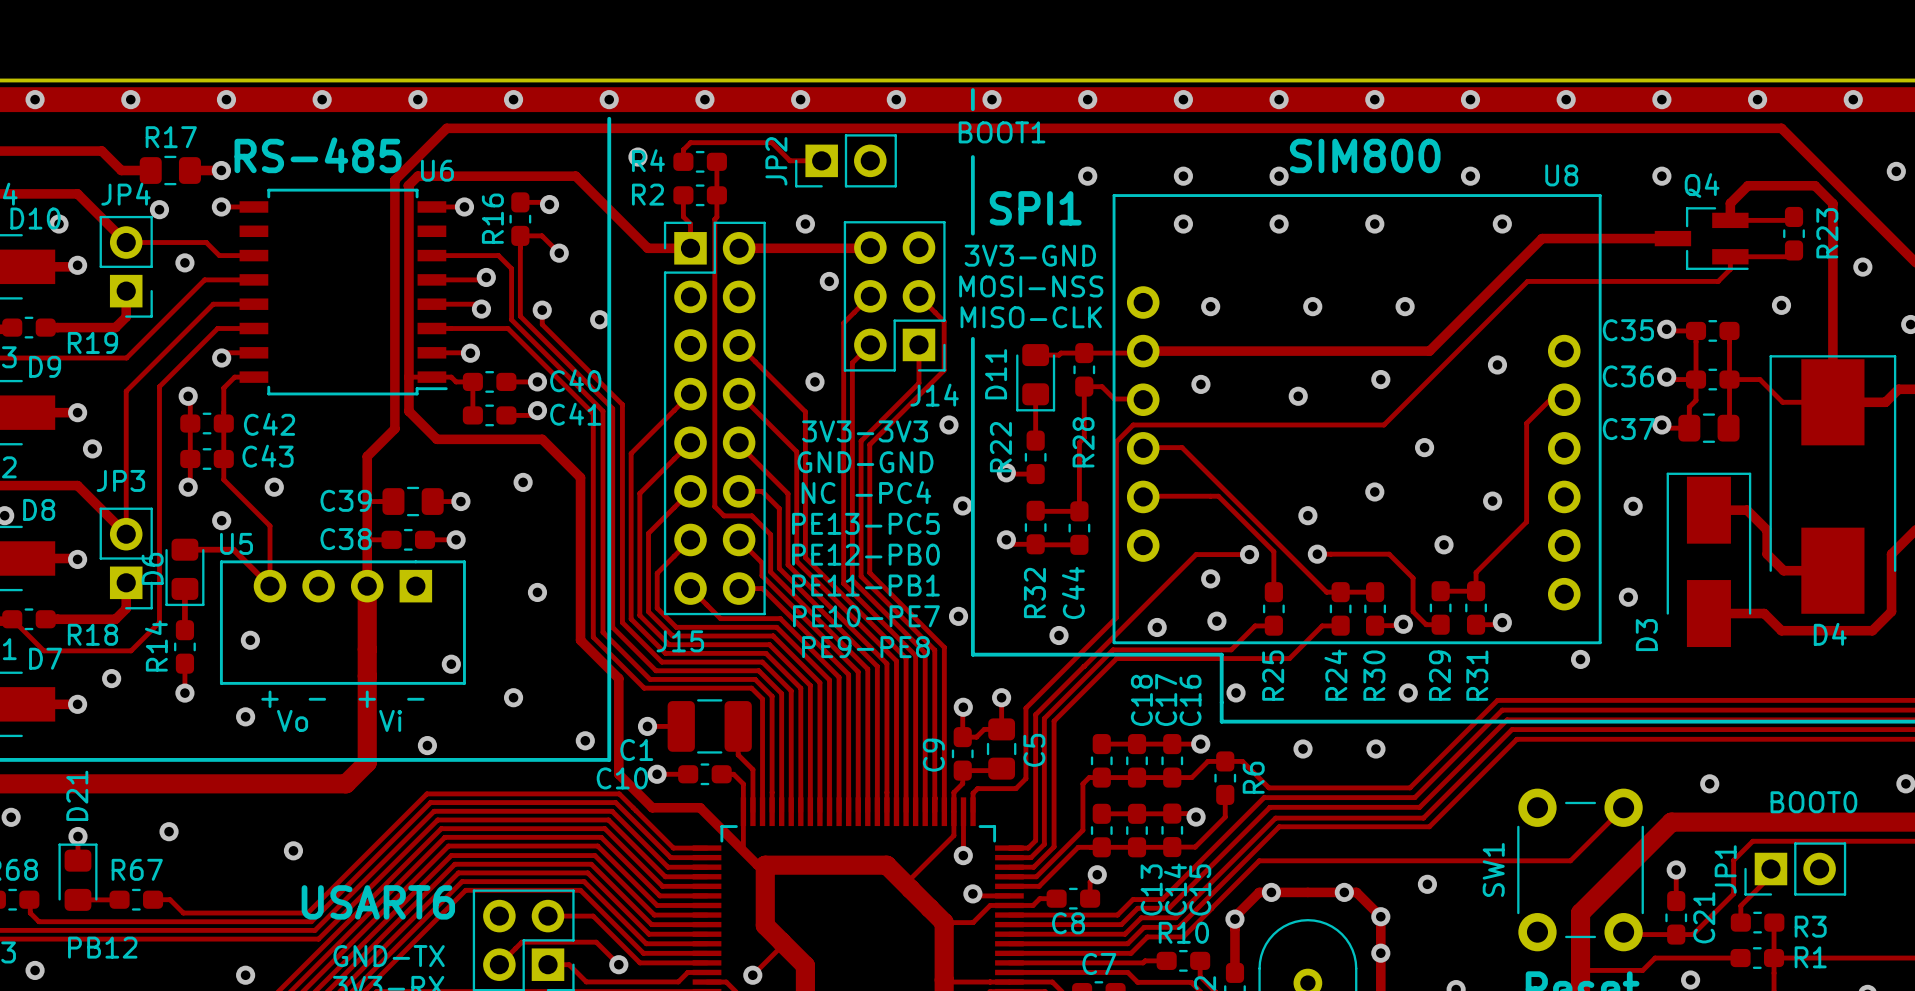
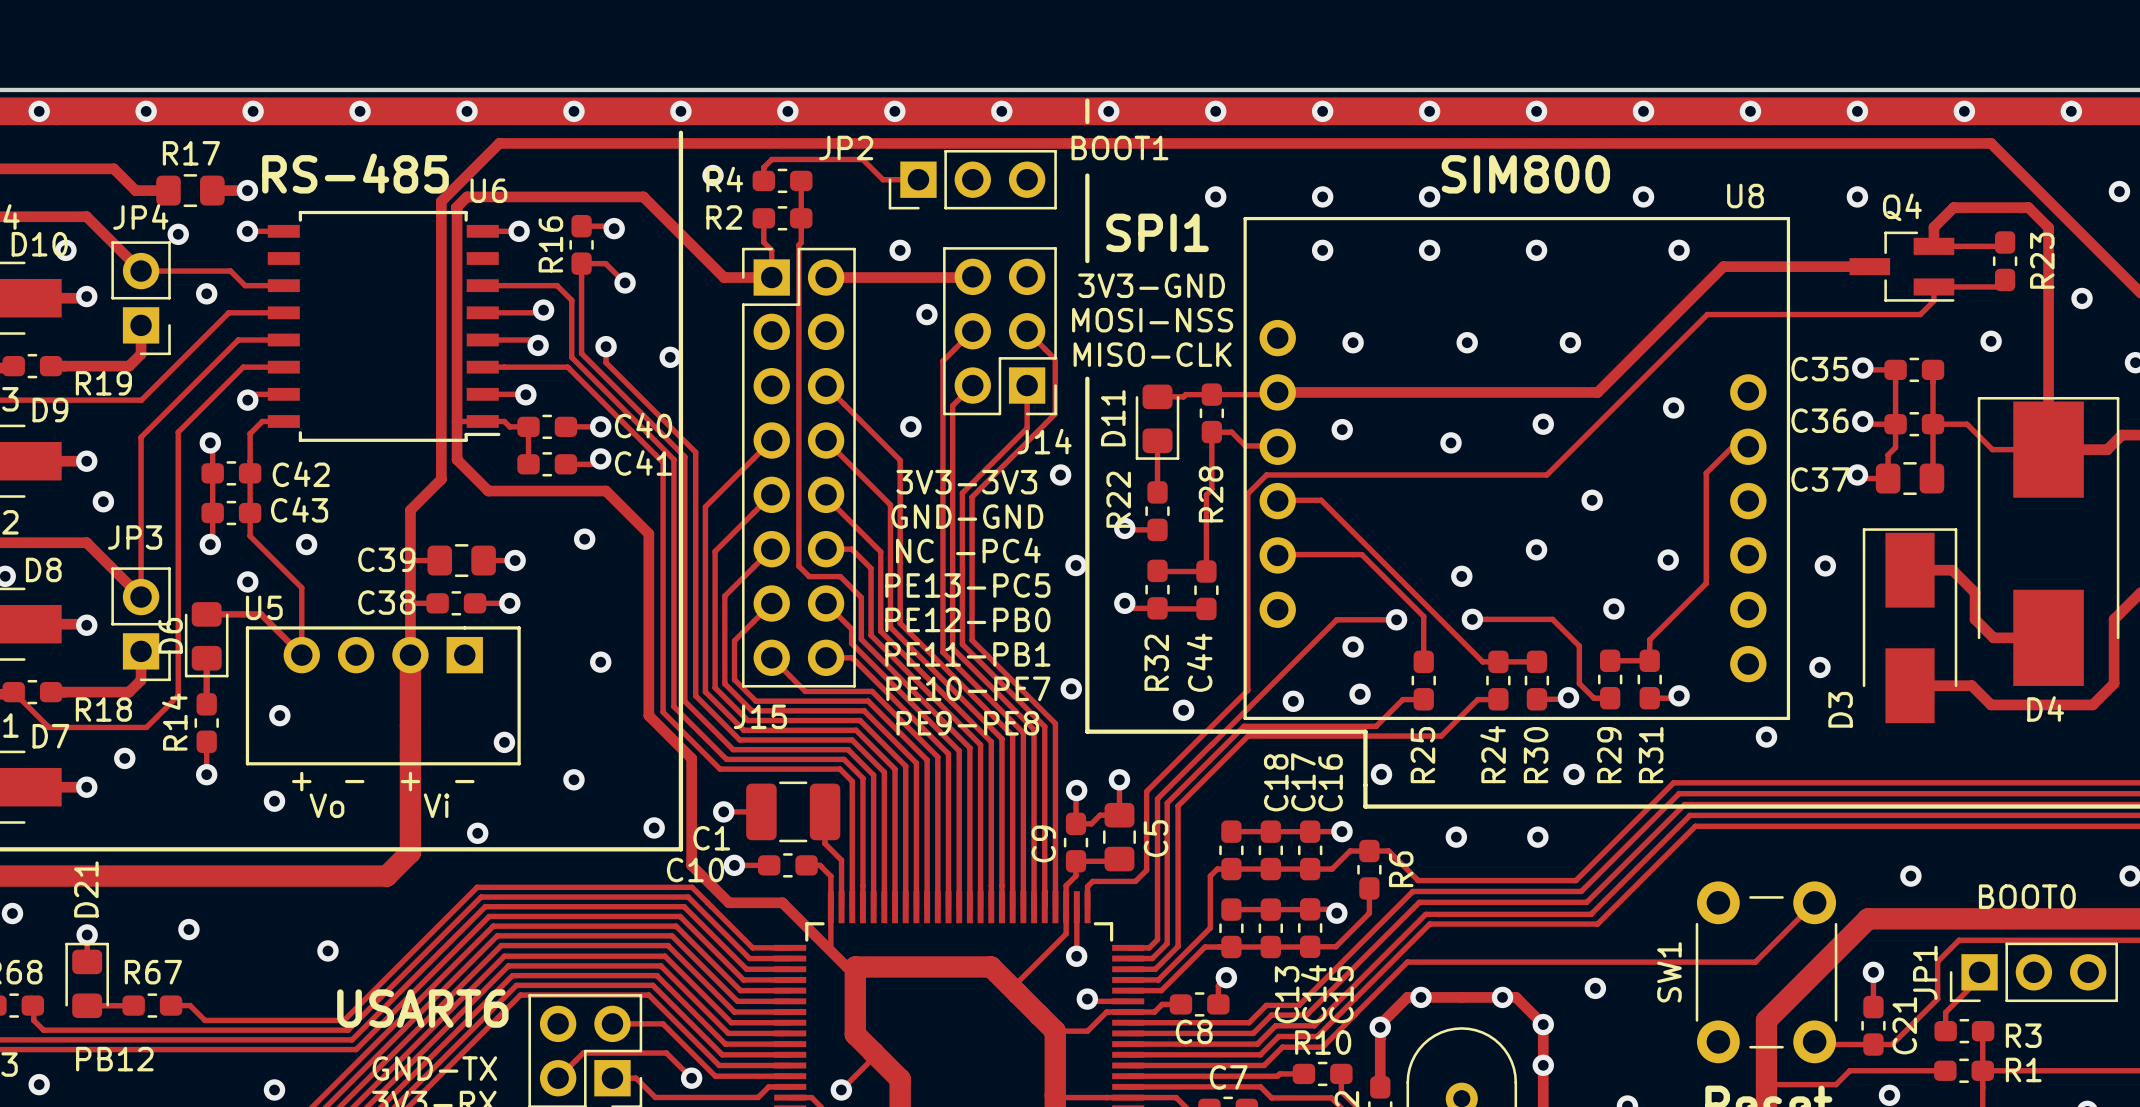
JP2 footprint: [795, 134, 897, 188] -> [888, 149, 1057, 210]
JP2 name position: JP2 (776, 161) -> JP2 (846, 147)
JP1 footprint: [1744, 842, 1847, 896] -> [1949, 942, 2118, 1003]

